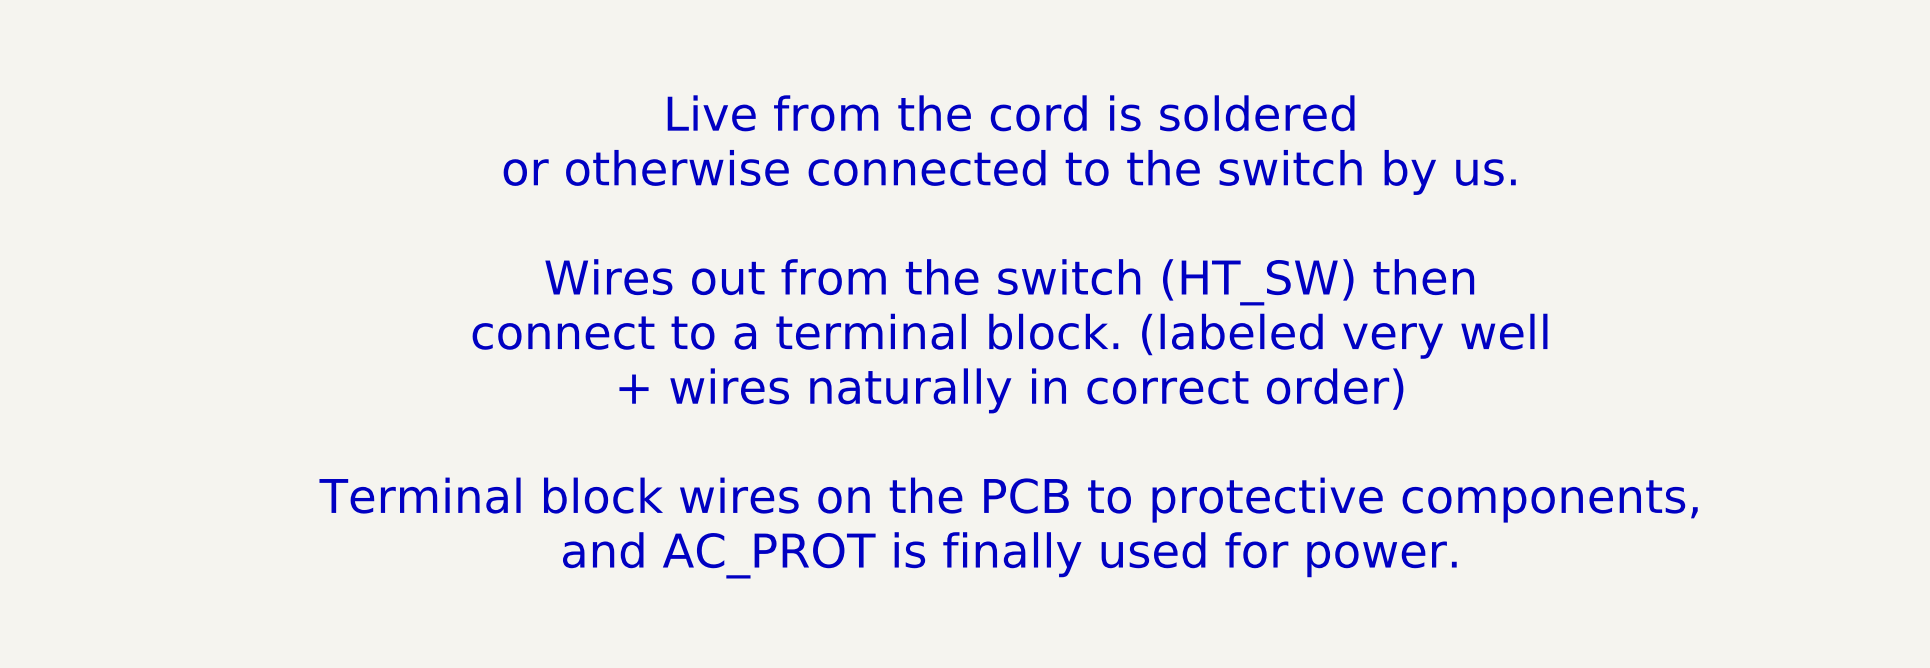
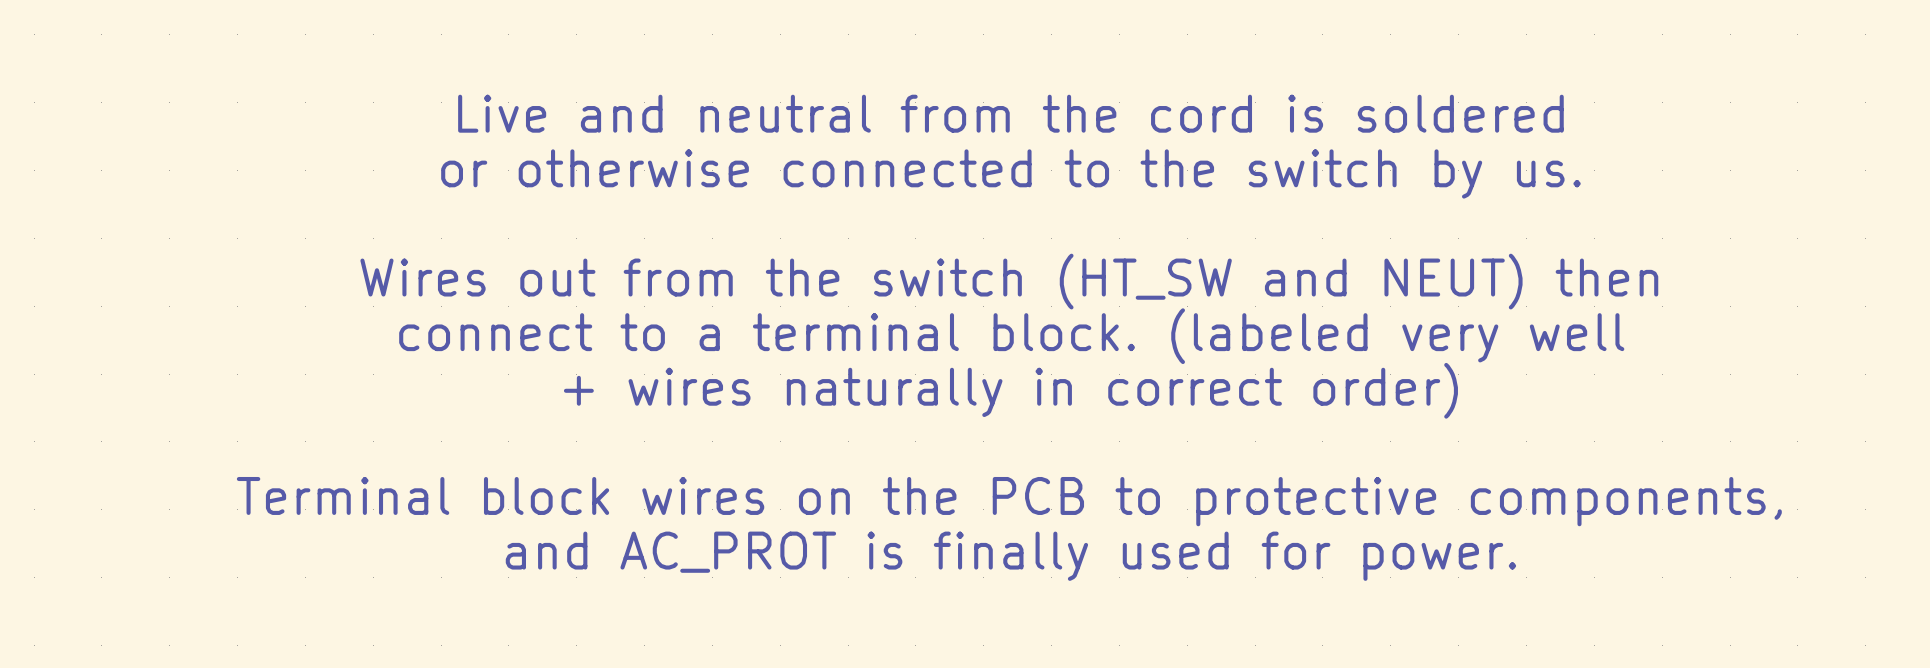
text: Live from the cord is soldered (1011, 113) -> Live and neutral from the cord is soldered (1010, 113)
text: Wires out from the switch (HT_SW) then (1009, 282) -> Wires out from the switch (HT_SW and NEUT) then (1009, 281)

